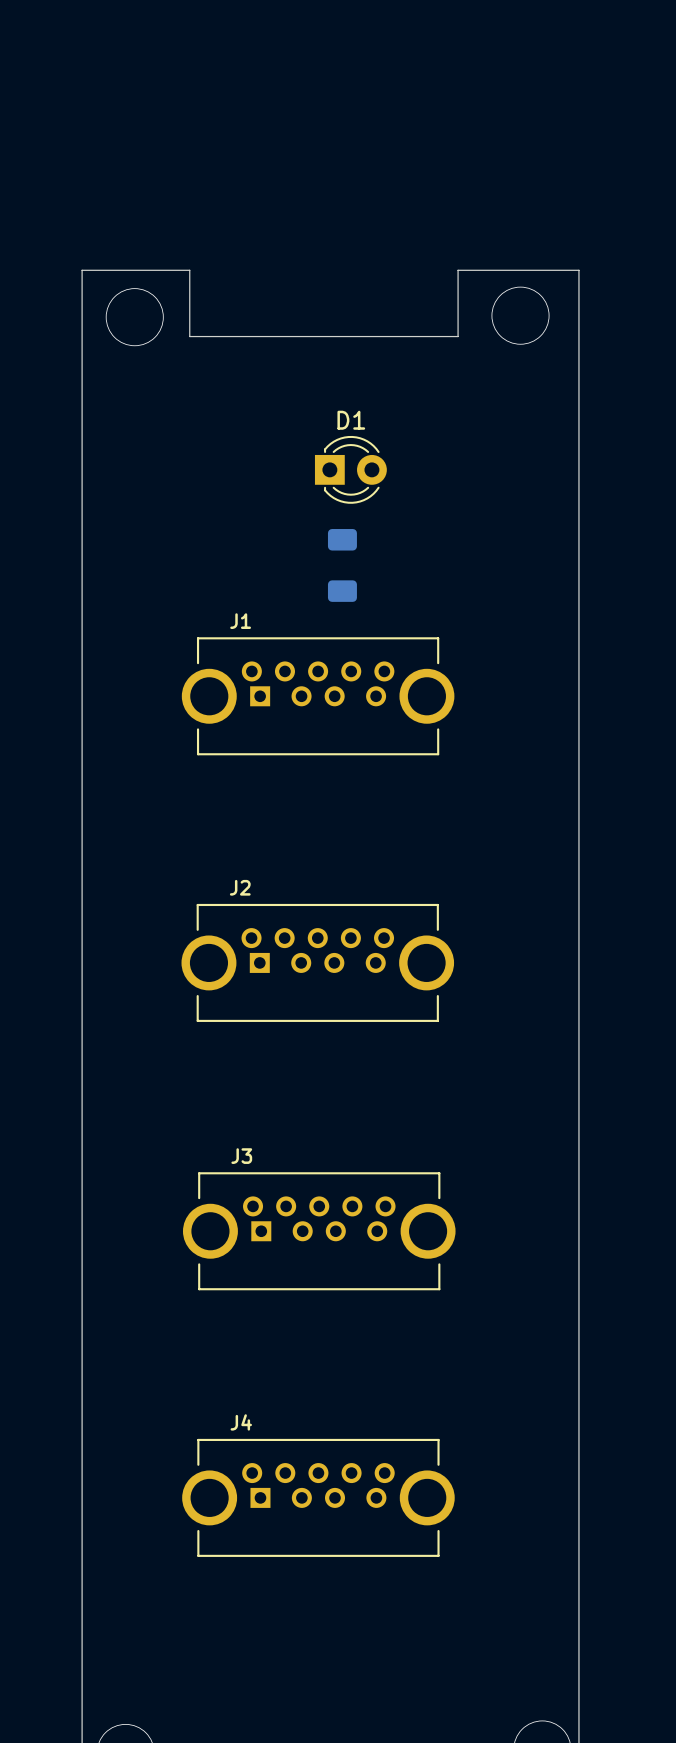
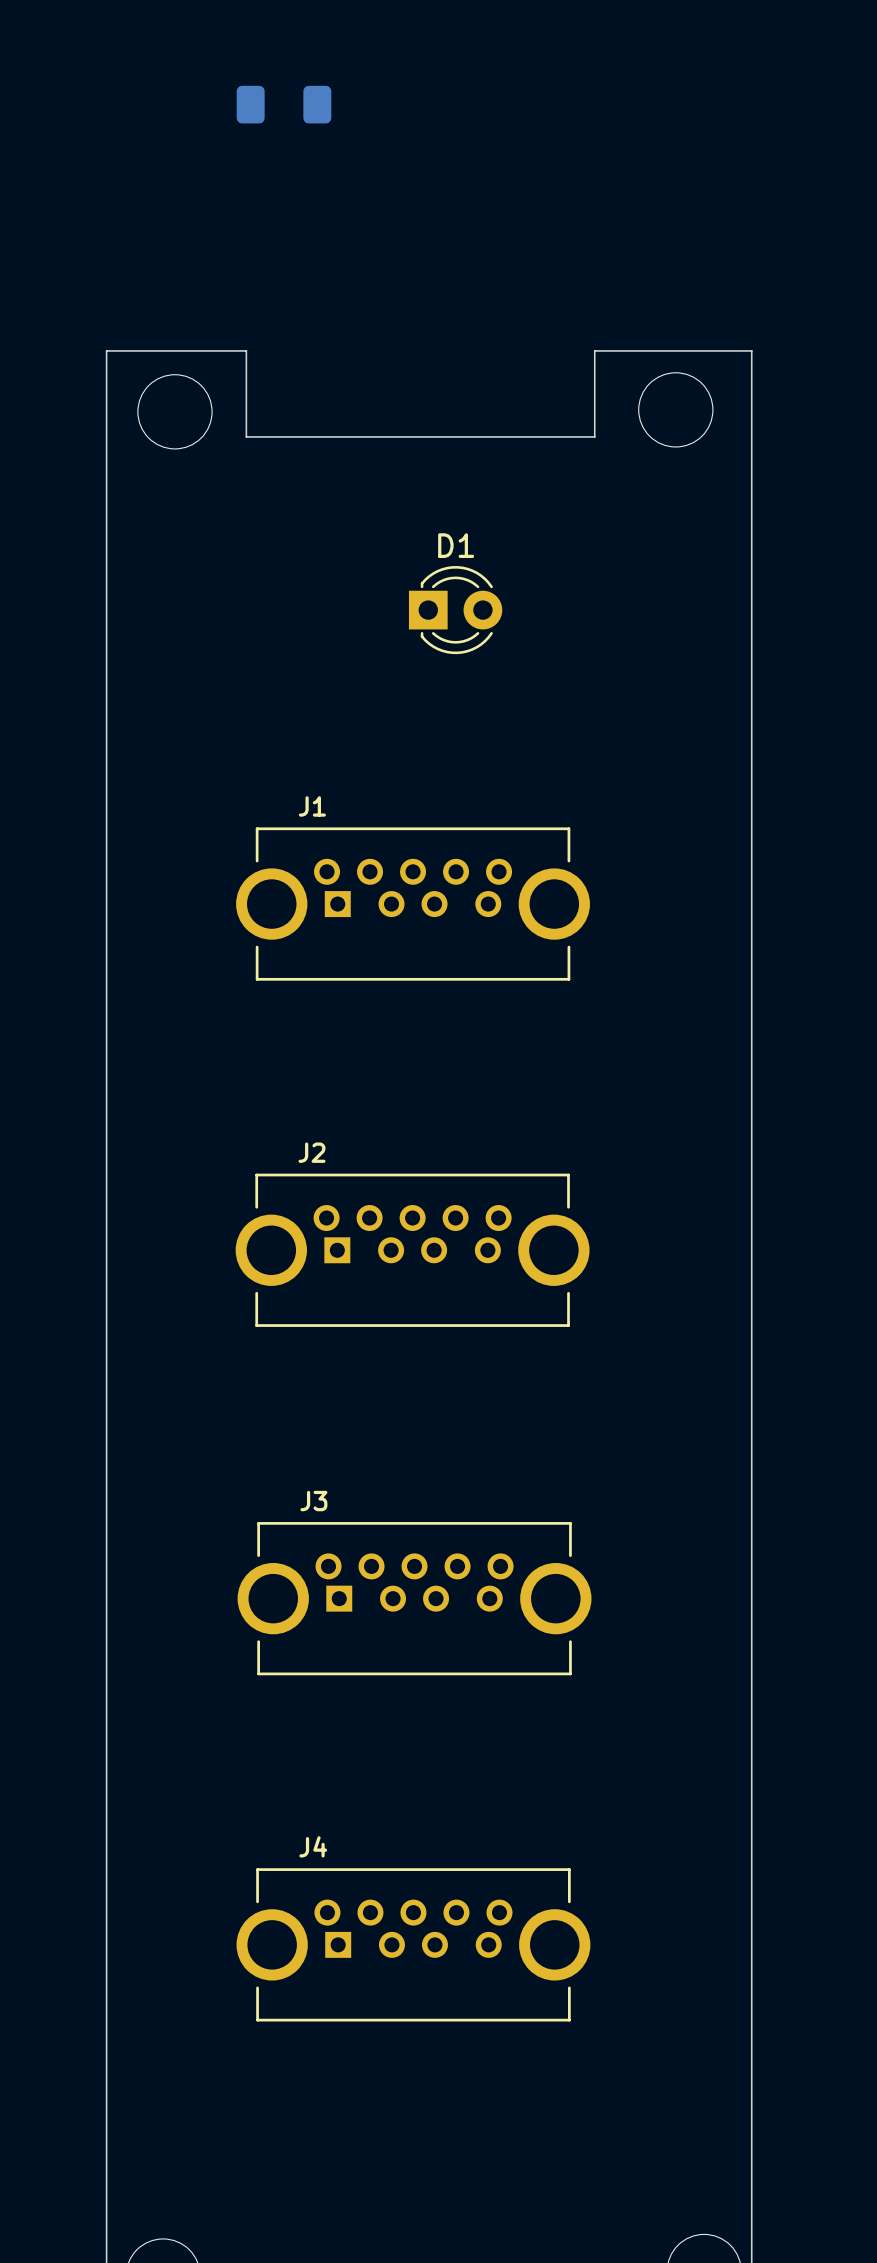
part: none -> (284, 104)
part: (342, 565) -> none

